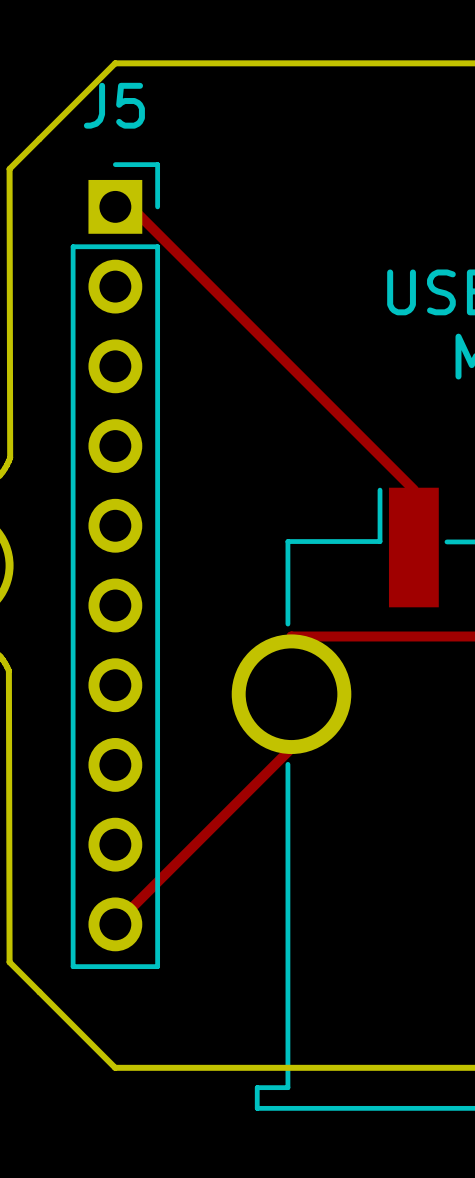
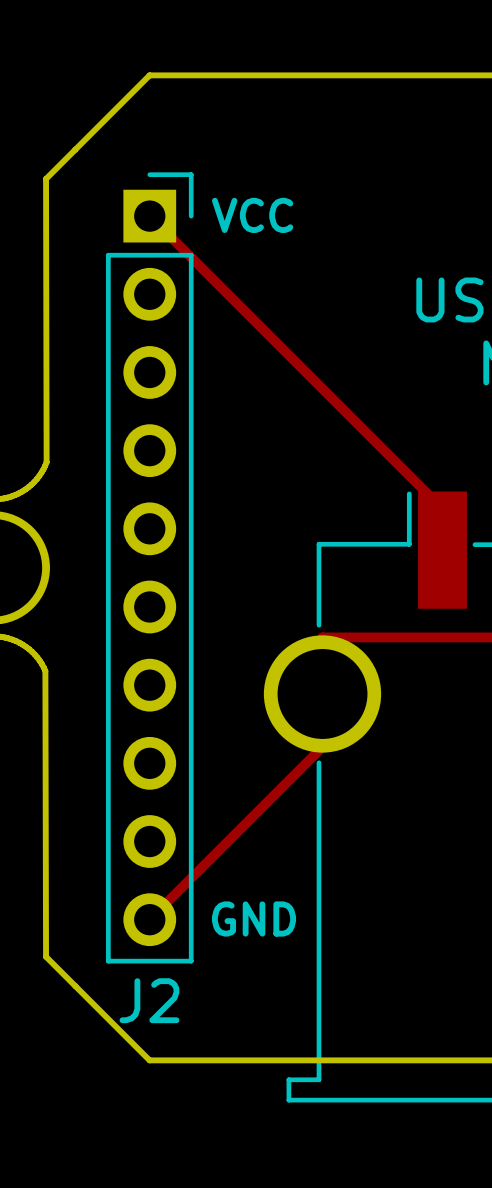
J5 name: J5 (114, 105) -> J2 (149, 1000)
top track: none -> (149, 216) (442, 508) (442, 550)
top track: (130, 206) (413, 489) -> none
text: none -> VCC (252, 215)
text: none -> GND (254, 918)

